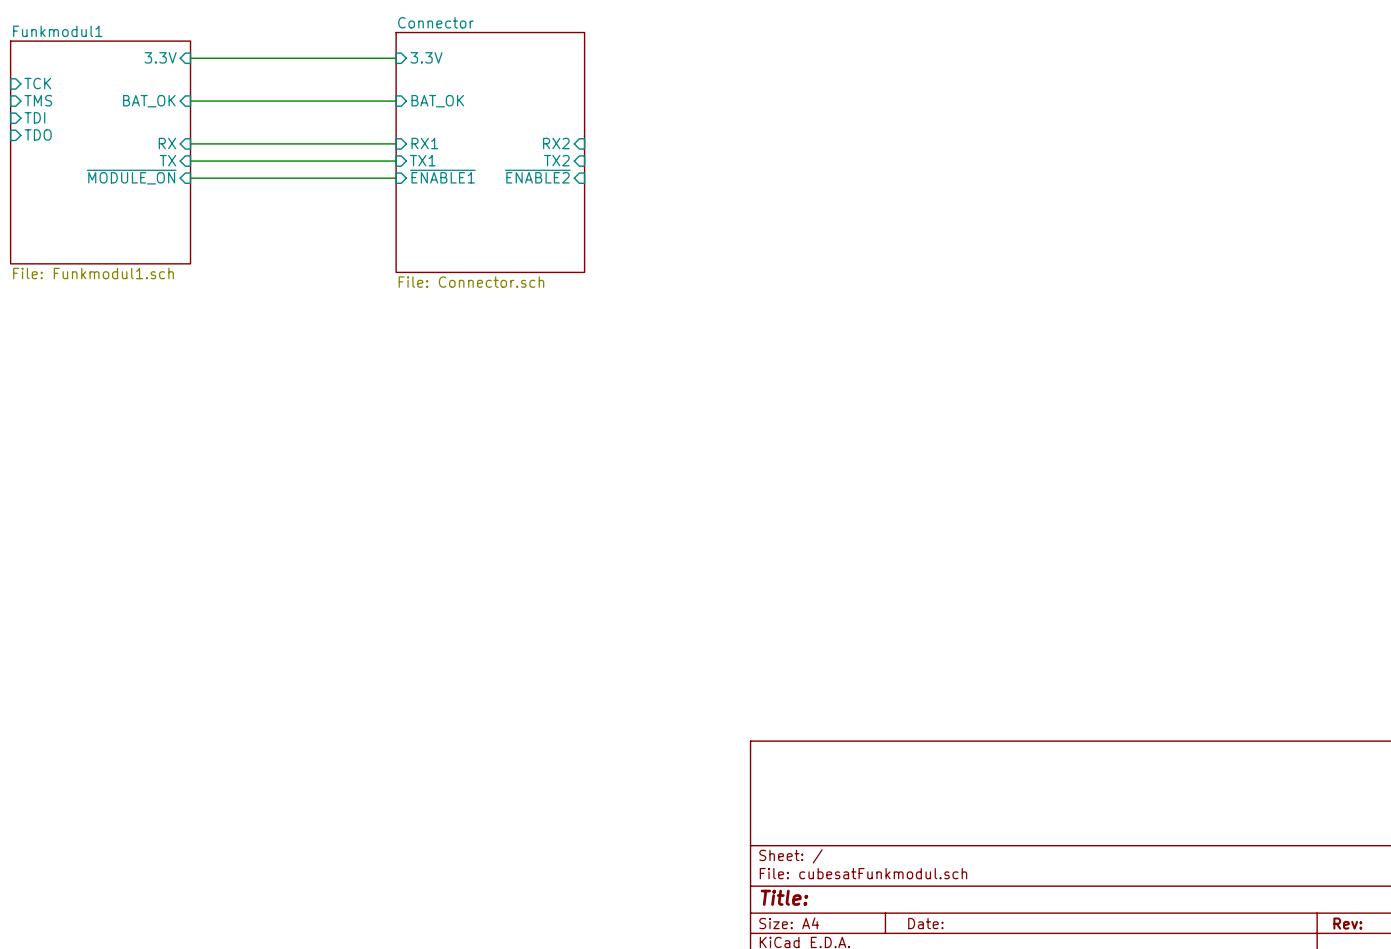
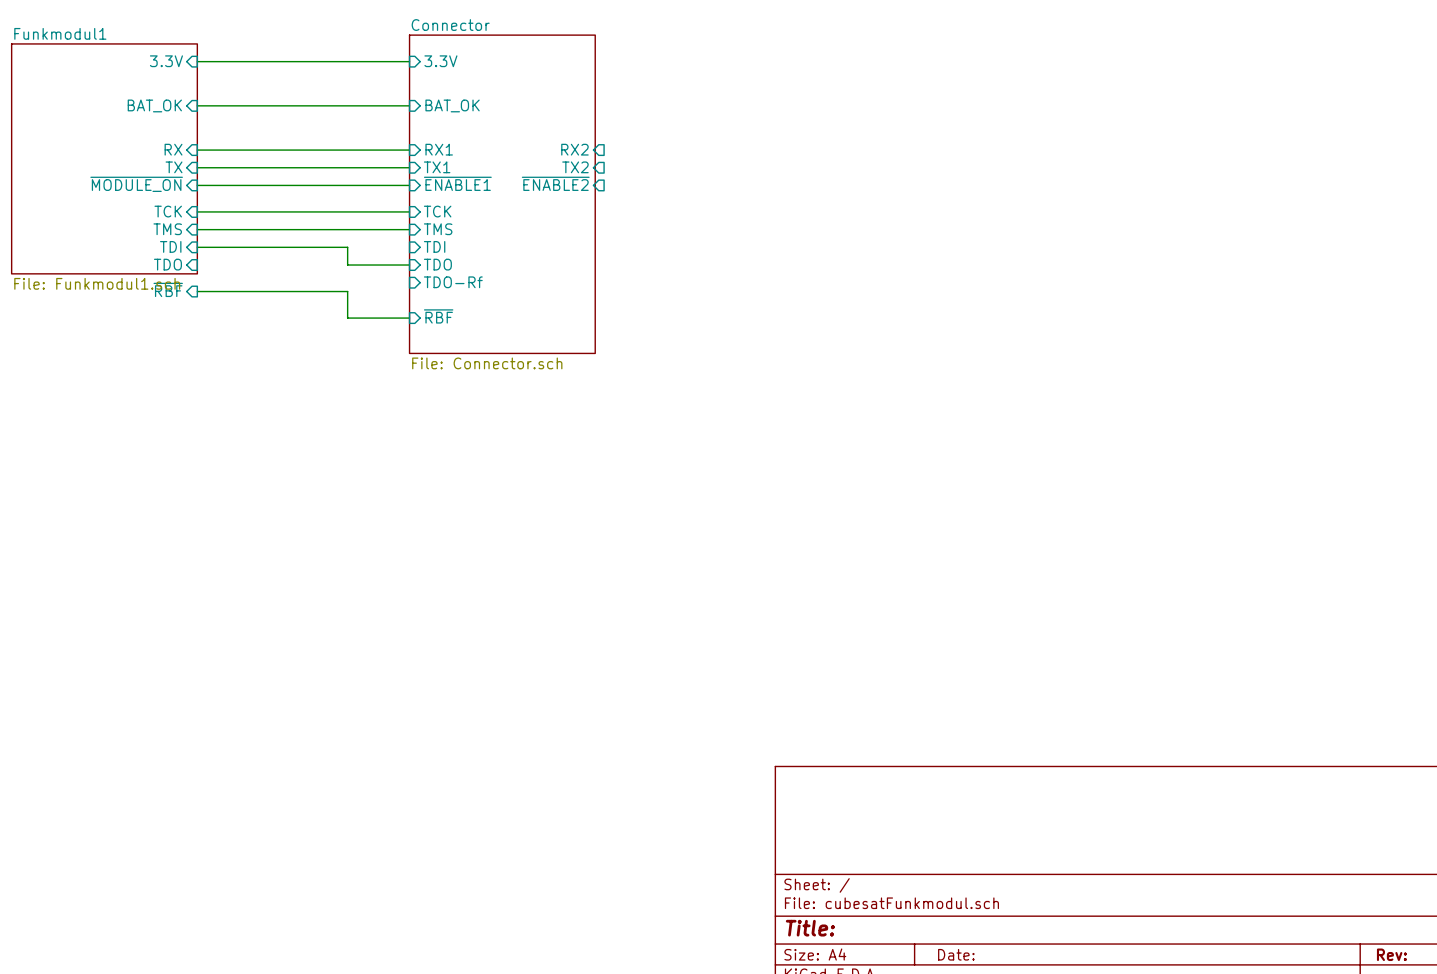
sheet pin: TCK (37, 83) -> none
sheet pin: TMS (38, 100) -> none
sheet pin: TDI (34, 117) -> none
sheet pin: TDO (38, 134) -> none
sheet Connector: File: Connector.sch (490, 152) -> none
sheet Connector: none -> File: Connector.sch (502, 194)
sheet pin: none -> TCK (168, 211)
wire: none -> (197, 211) (409, 211)
sheet pin: none -> TCK (437, 211)
sheet pin: none -> TMS (167, 229)
sheet pin: none -> TMS (438, 229)
wire: none -> (197, 229) (409, 229)
sheet pin: none -> TDI (170, 246)
sheet pin: none -> TDI (434, 246)
wire: none -> (197, 247) (347, 247) (347, 265) (409, 265)
sheet pin: none -> TDO (167, 264)
sheet pin: none -> TDO (437, 264)
sheet pin: none -> TDO-Rf (453, 282)
sheet pin: none -> ~{RBF} (168, 289)
wire: none -> (197, 291) (347, 291) (347, 318) (409, 318)
sheet pin: none -> ~{RBF} (438, 316)

